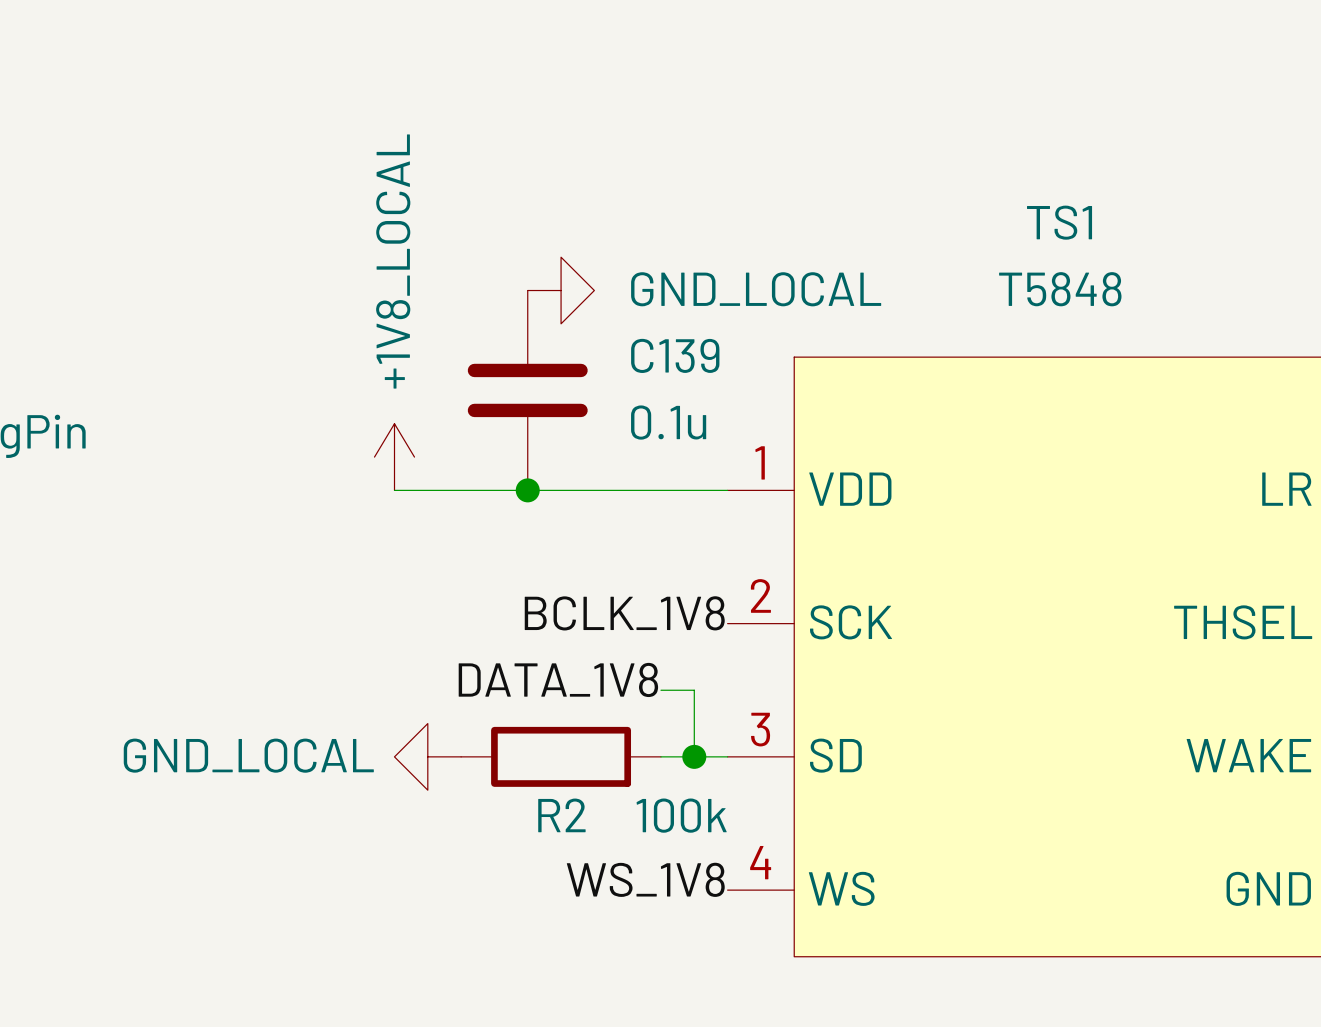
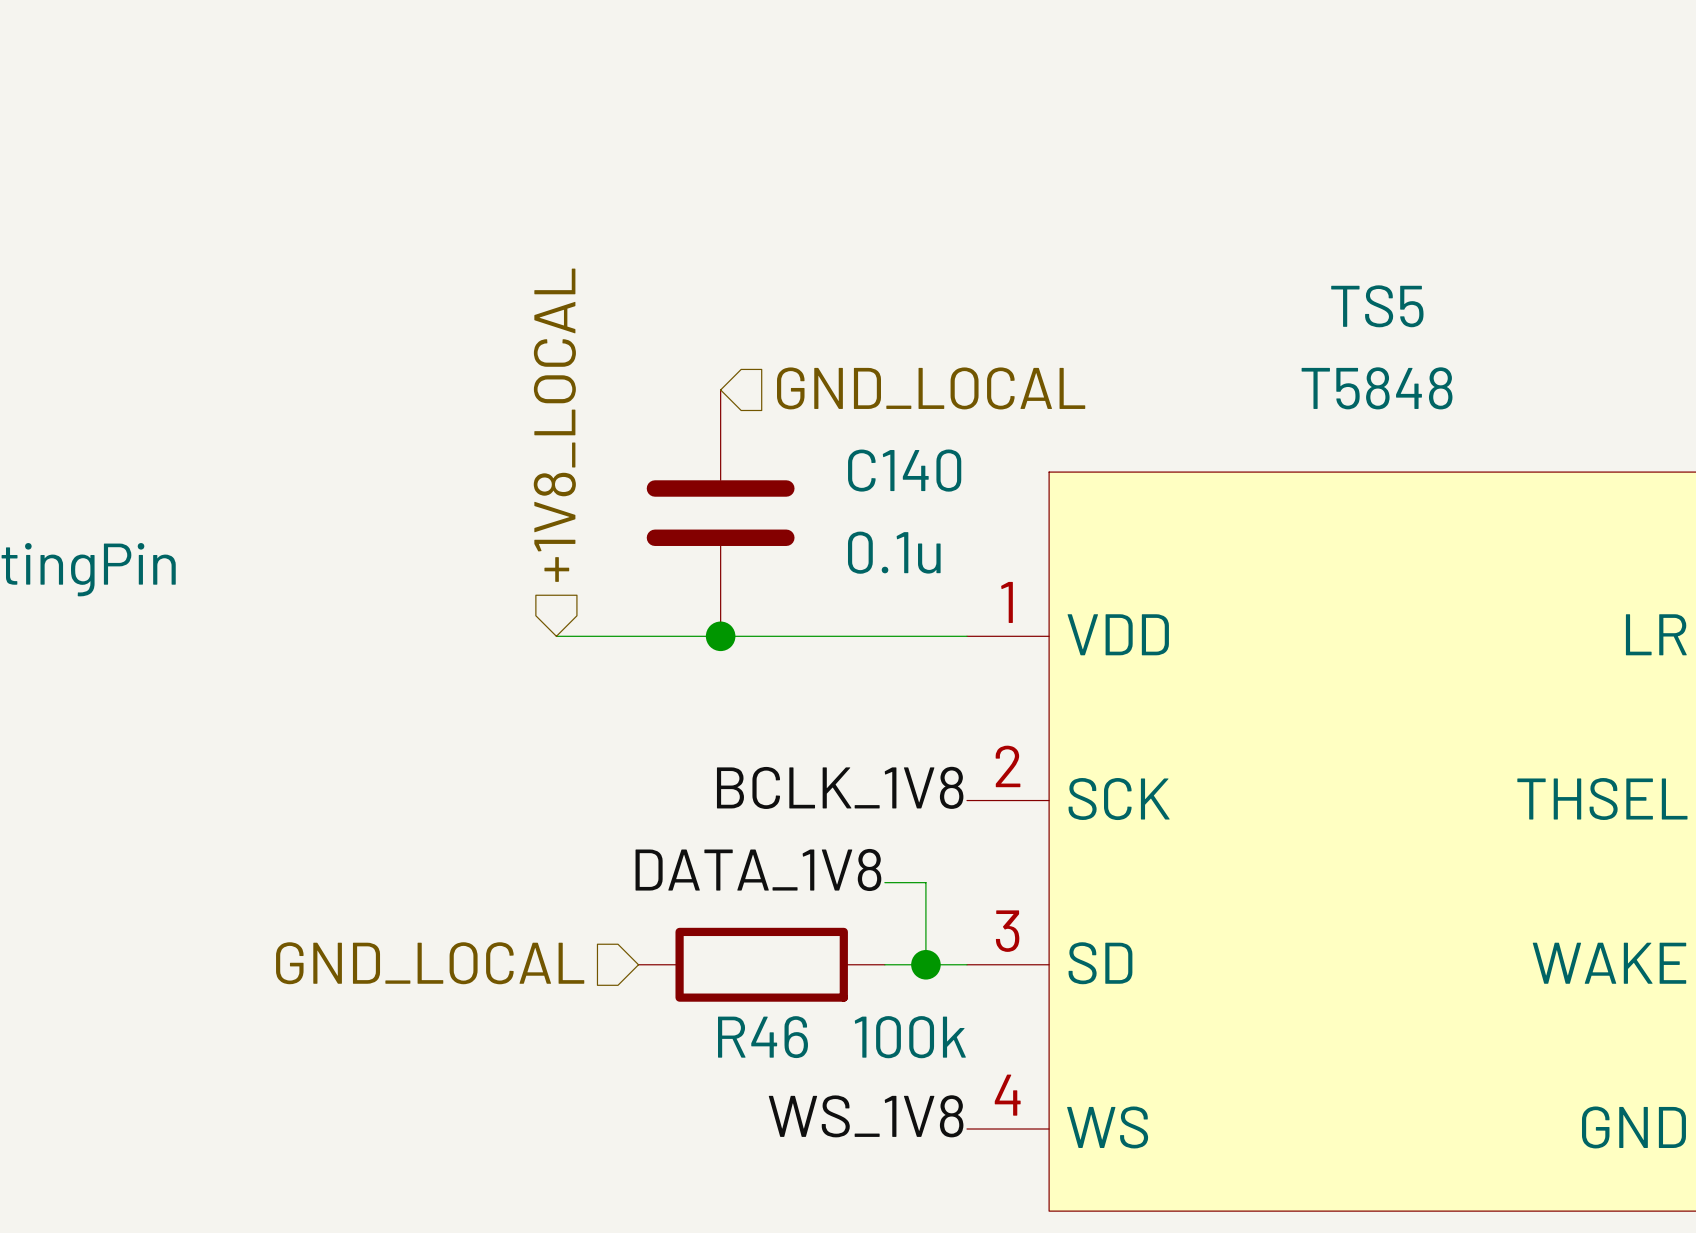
TS1 name: TS1 (1059, 222) -> TS5 (1377, 306)
hierarchical label: none -> GND_LOCAL (931, 388)
power symbol: GND_LOCAL (561, 290) -> none
hierarchical label: none -> +1V8_LOCAL (554, 425)
C139 name: C139 (675, 355) -> C140 (904, 470)
power symbol: +1V8_LOCAL (394, 457) -> none
hierarchical label: none -> GND_LOCAL (430, 963)
power symbol: GND_LOCAL (427, 756) -> none
R2 name: R2 (561, 815) -> R46 (762, 1037)

